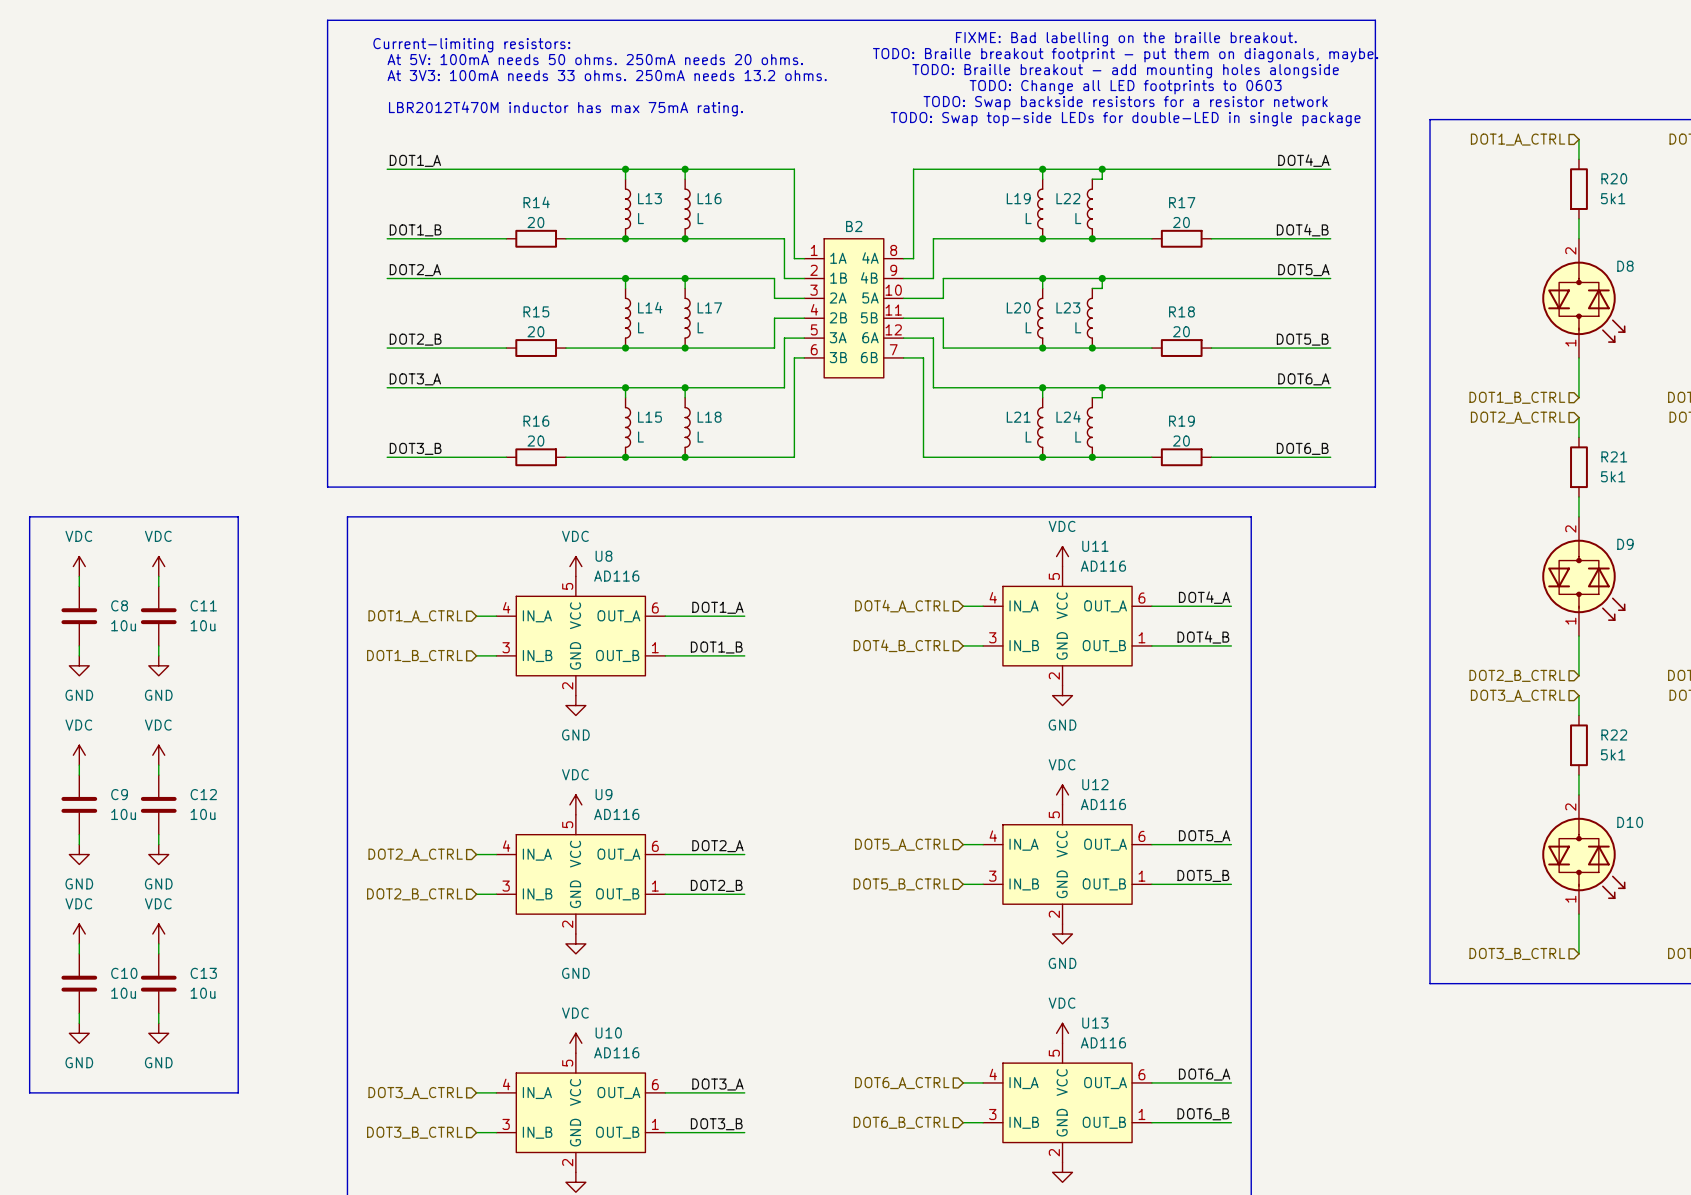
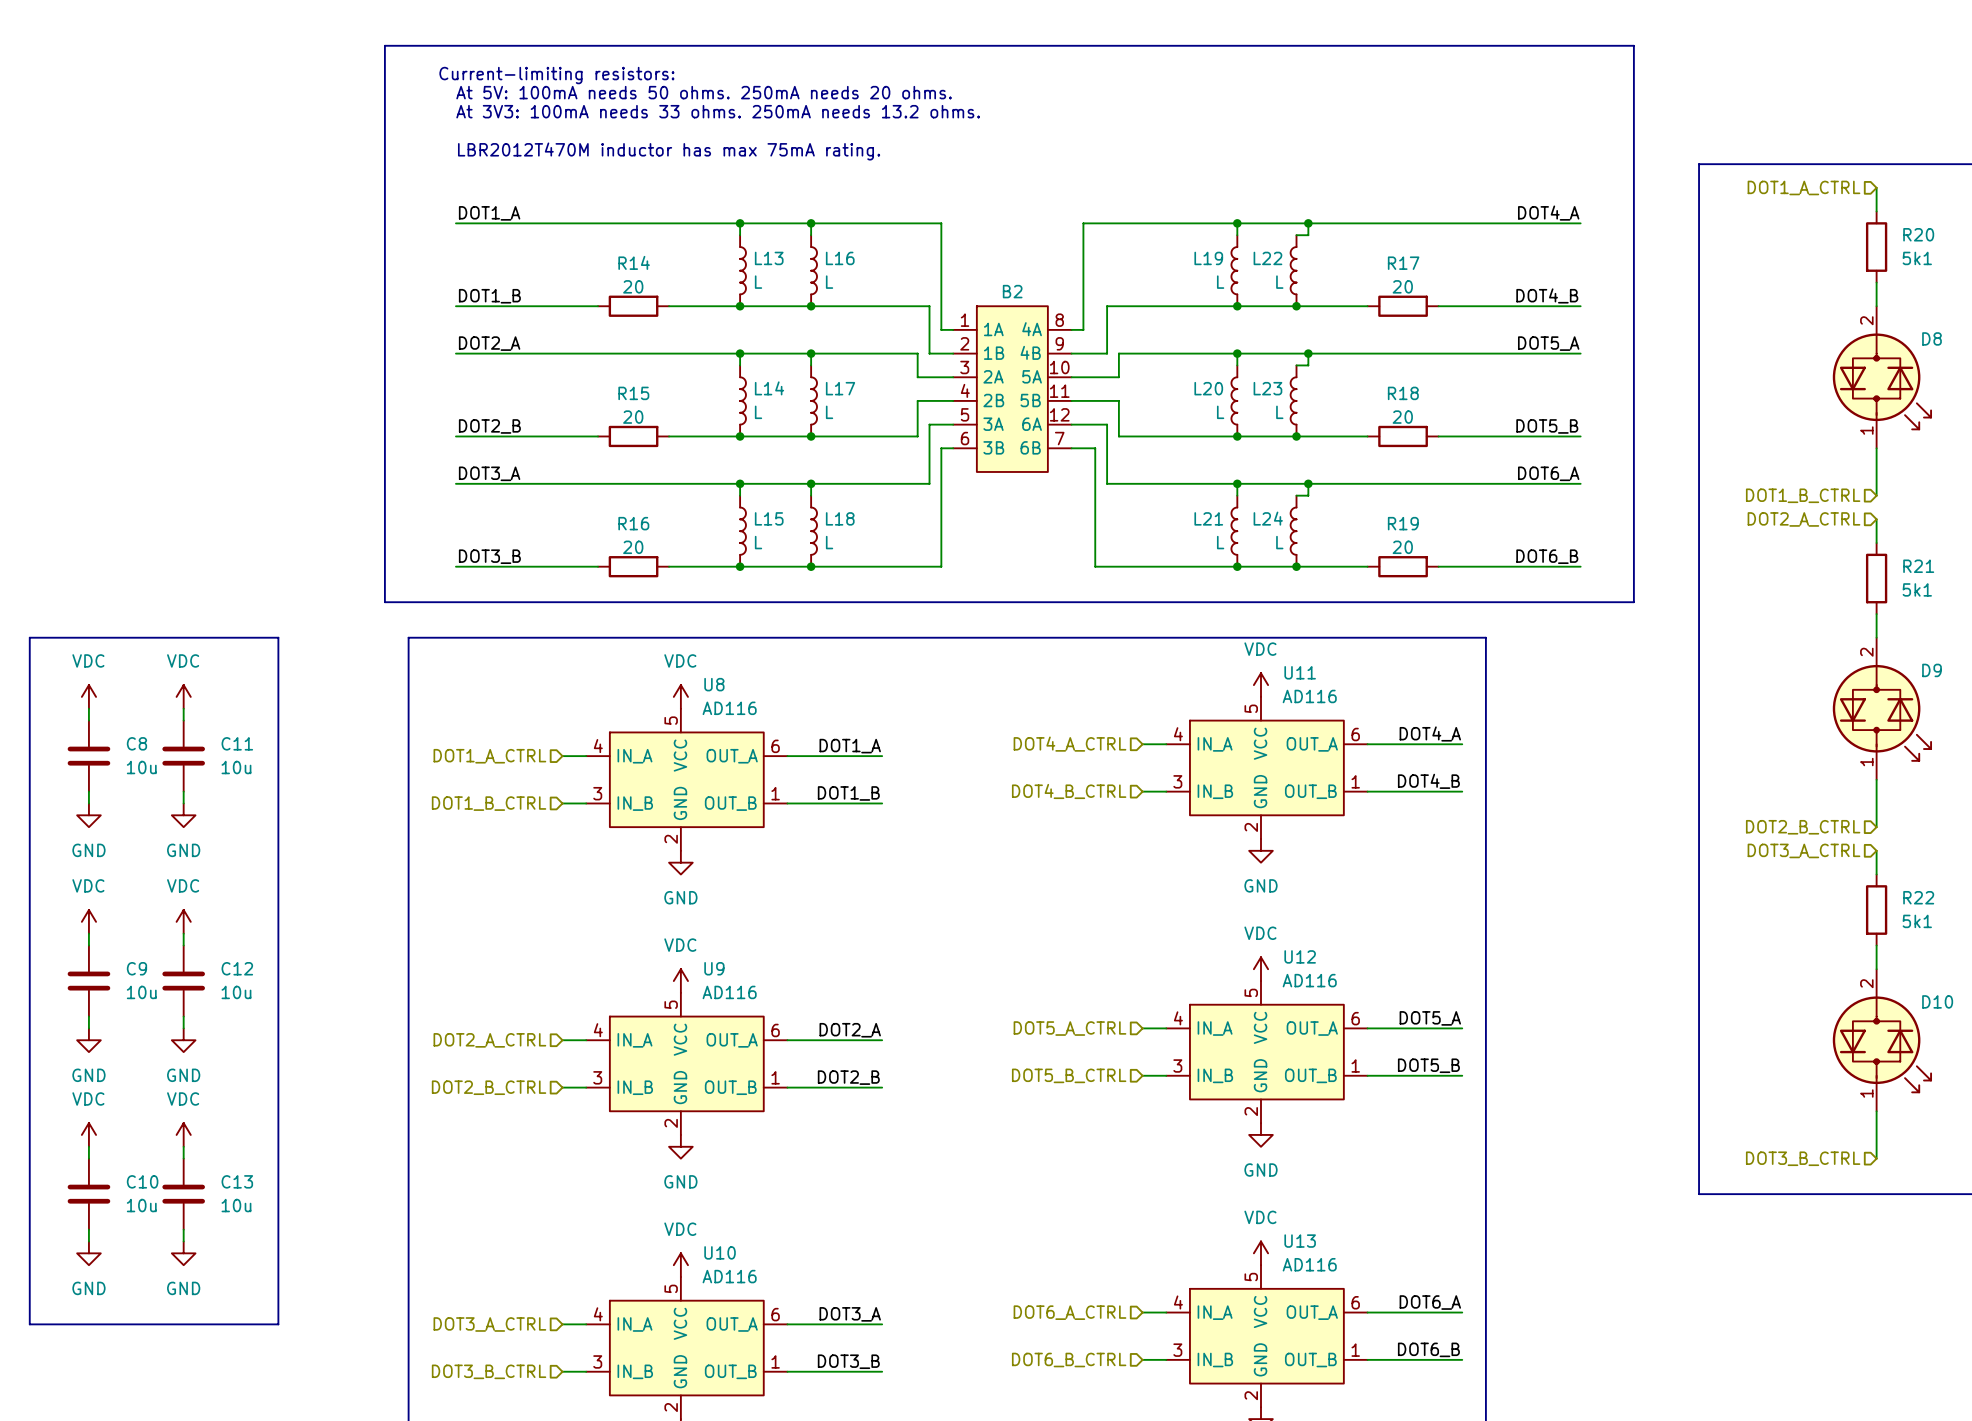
text: FIXME: Bad labelling on the braille breakout. (1126, 39) -> none
text: TODO: Braille breakout footprint - put them on diagonals, maybe. (1125, 55) -> none
text: TODO: Braille breakout - add mounting holes alongside (1125, 71) -> none
text: TODO: Change all LED footprints to 0603 (1125, 87) -> none
text: TODO: Swap backside resistors for a resistor network (1125, 103) -> none
text: TODO: Swap top-side LEDs for double-LED in single package (1125, 119) -> none

